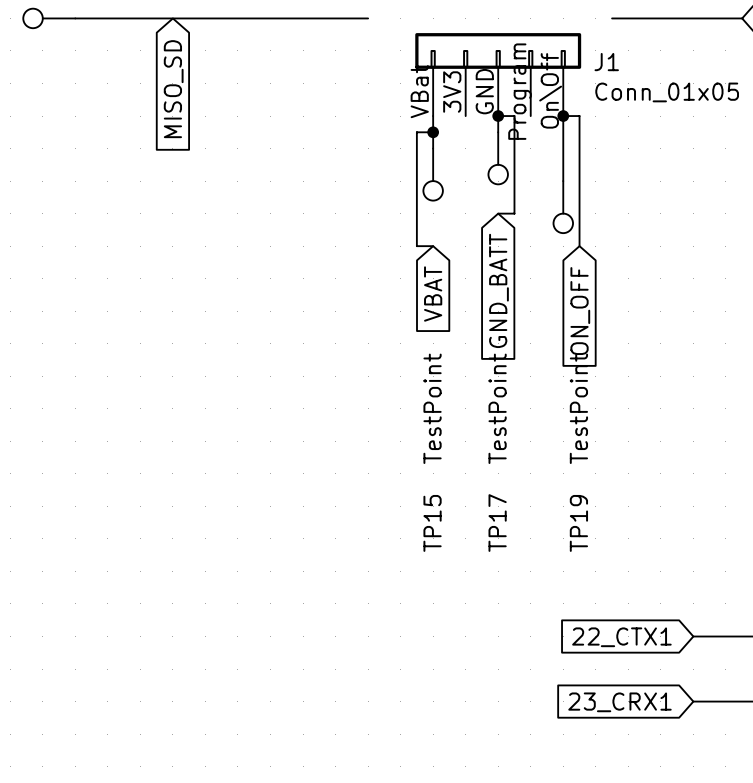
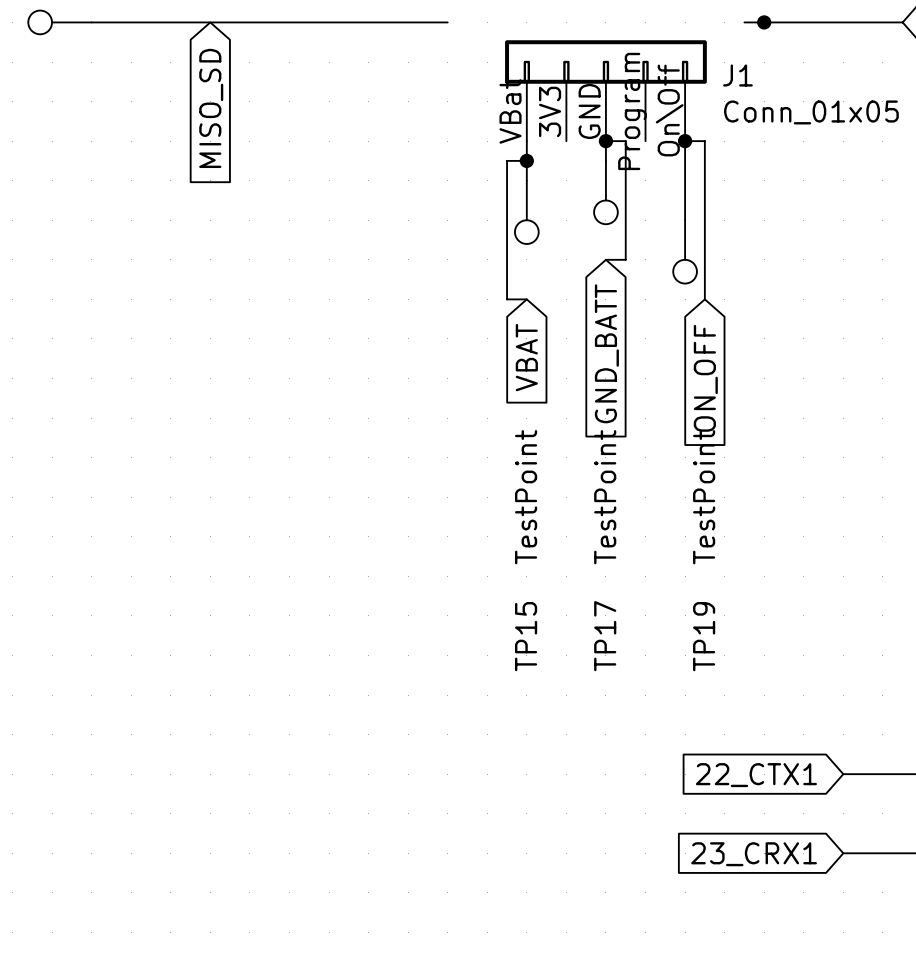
junction: none -> (764, 22)

